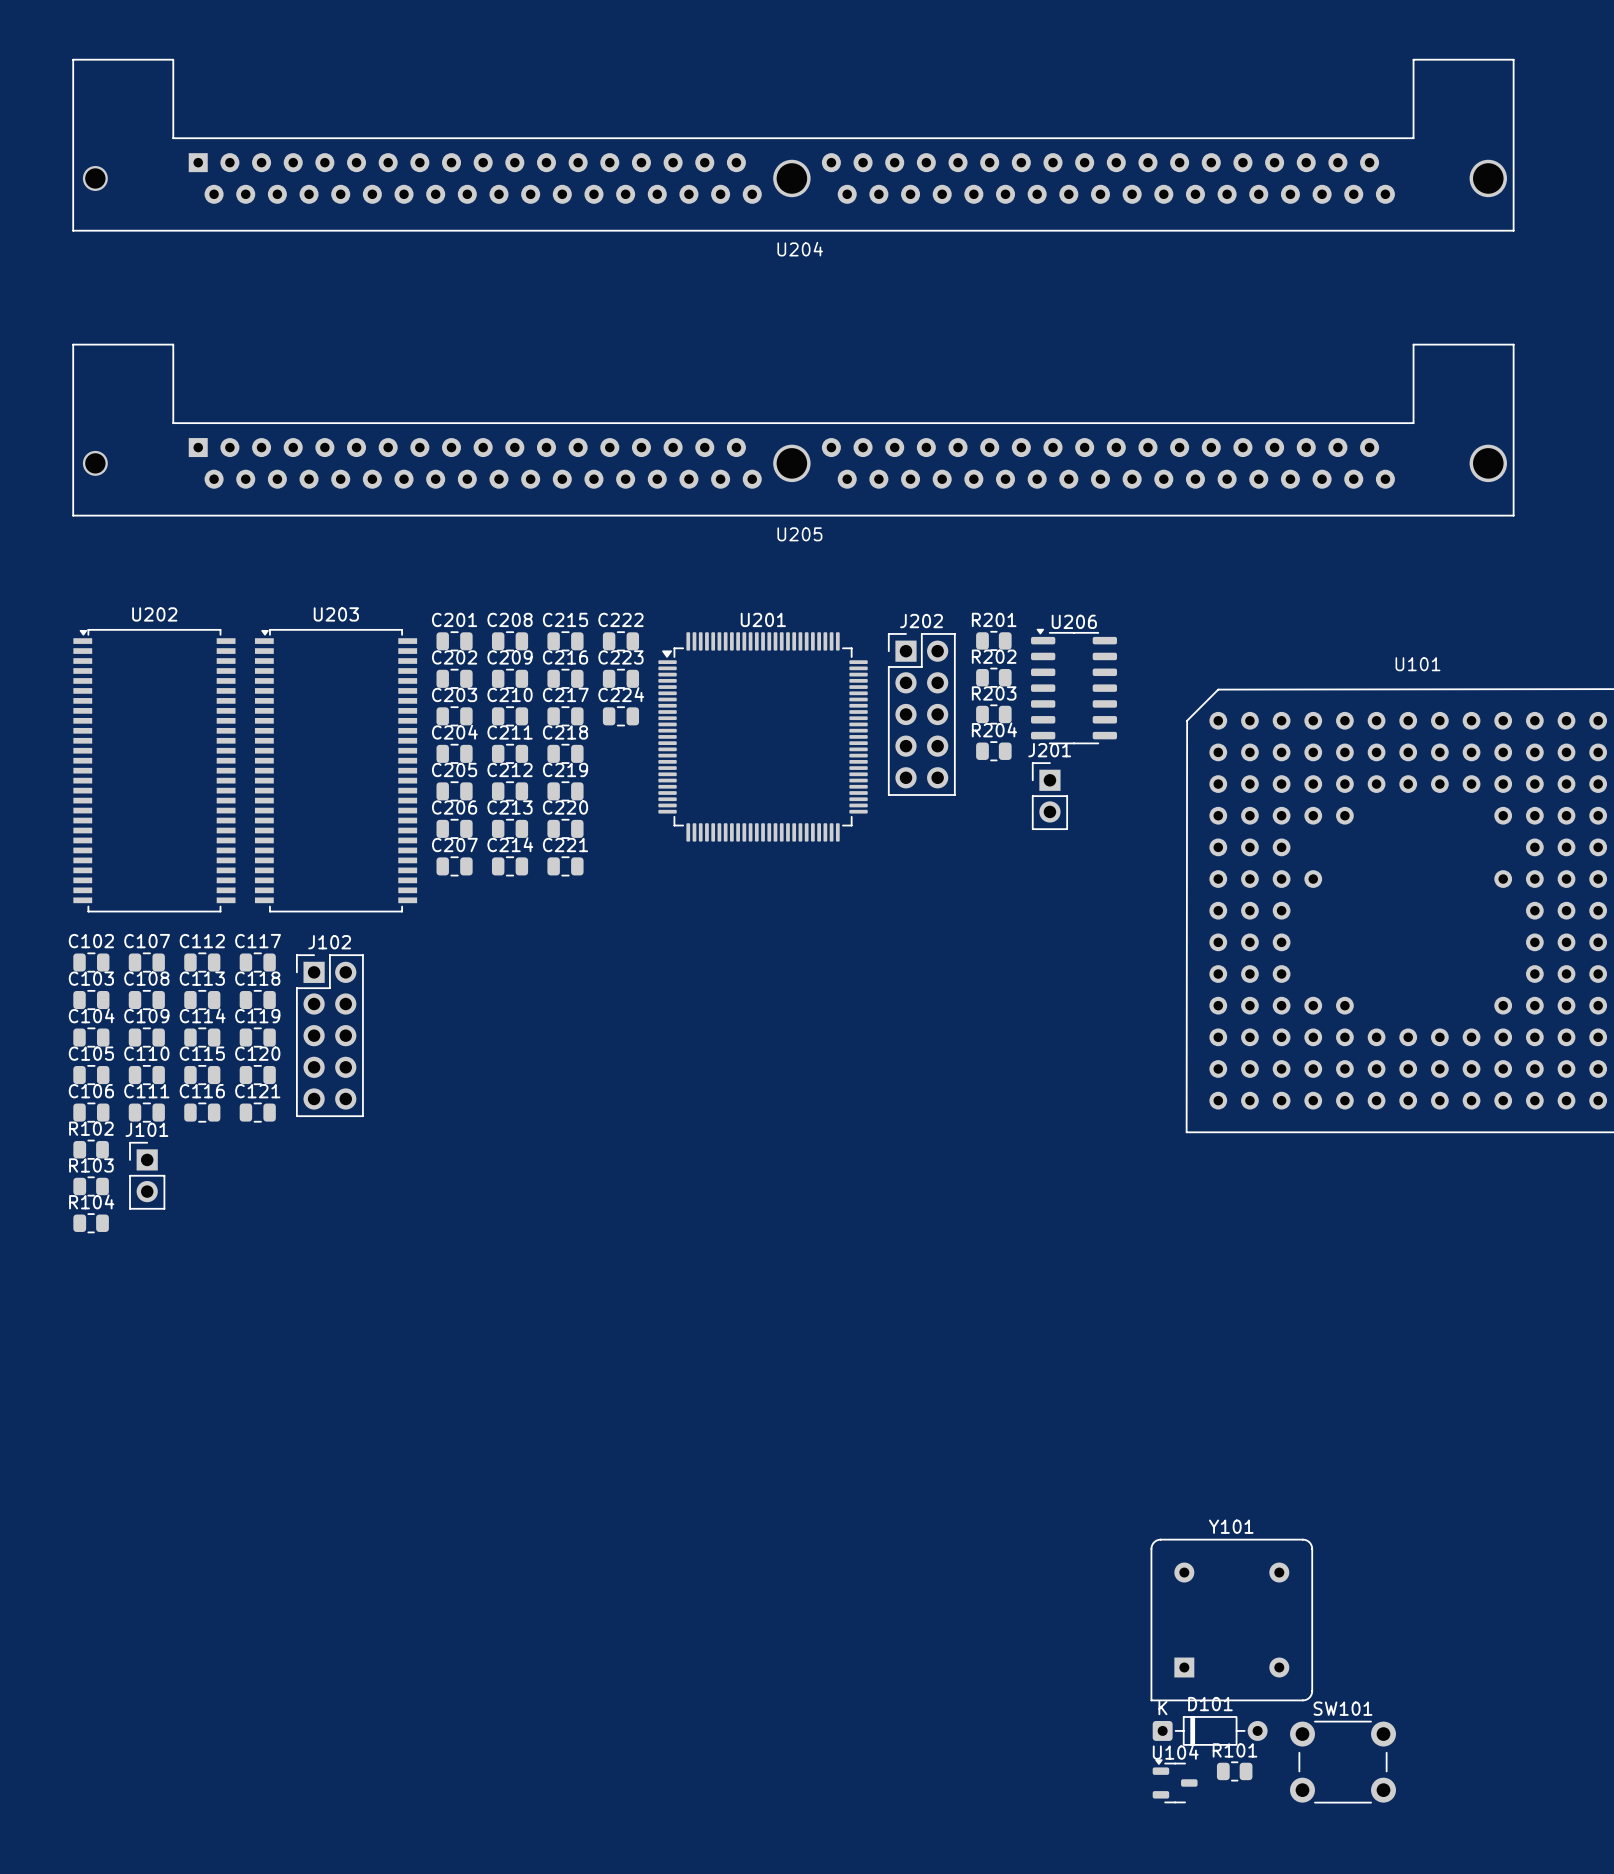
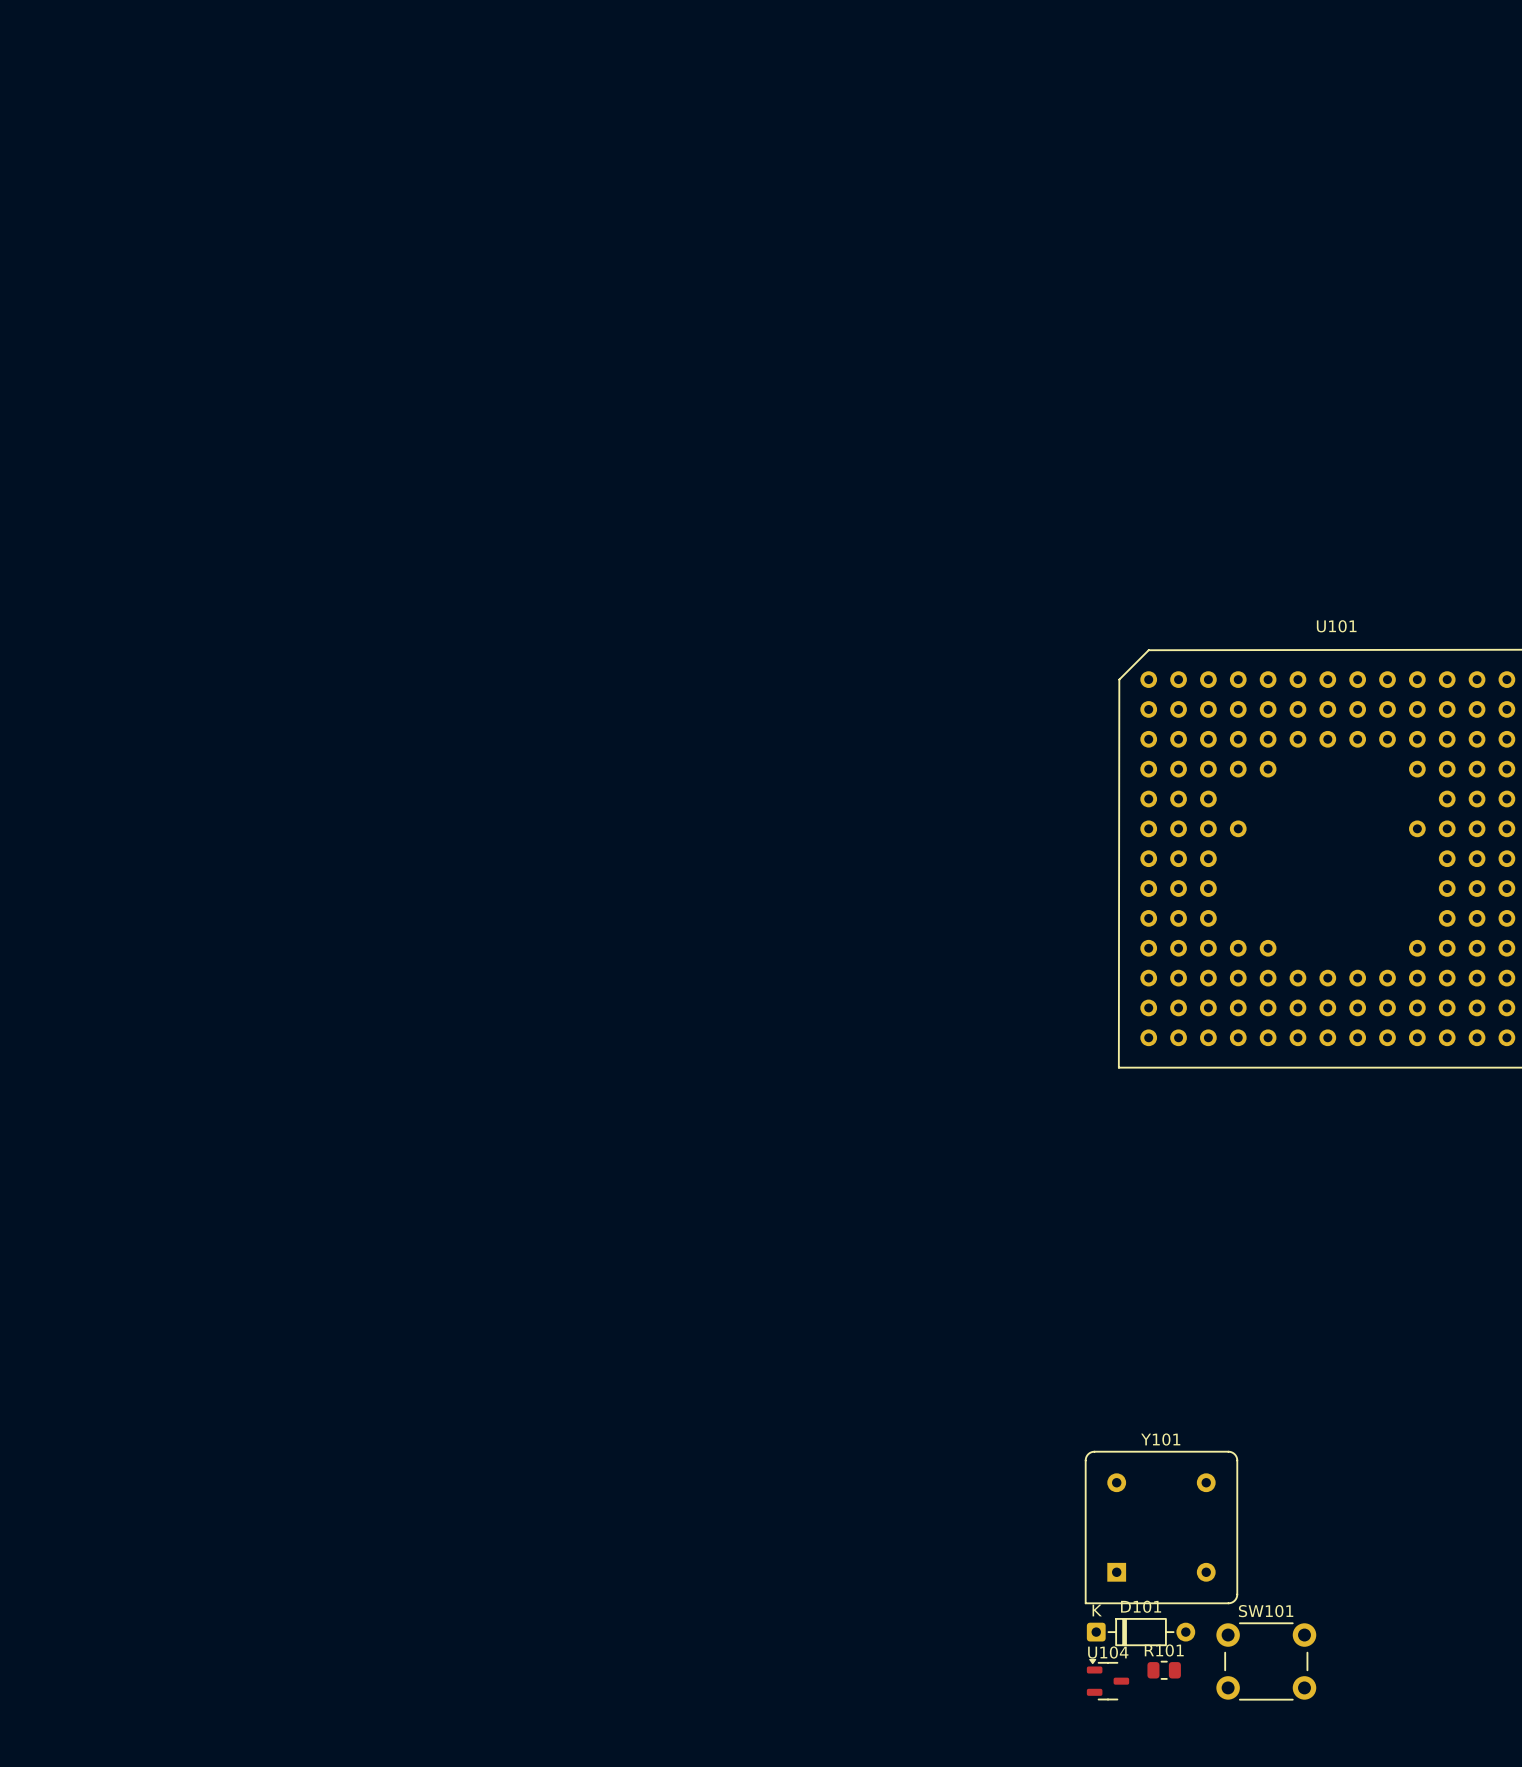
U204: (792, 195) -> none
U205: (792, 480) -> none
R201: (993, 640) -> none
C201: (454, 641) -> none
C208: (510, 641) -> none
C215: (565, 641) -> none
C222: (620, 641) -> none
R202: (993, 677) -> none
C202: (454, 678) -> none
C209: (510, 678) -> none
C216: (565, 678) -> none
C223: (620, 678) -> none
U206: (1074, 686) -> none
J202: (921, 714) -> none
R203: (993, 714) -> none
C203: (454, 716) -> none
C210: (510, 716) -> none
C217: (565, 716) -> none
C224: (620, 716) -> none
U201: (763, 736) -> none
R204: (993, 751) -> none
C204: (454, 753) -> none
C211: (510, 753) -> none
C218: (565, 753) -> none
U202: (154, 770) -> none
U203: (336, 770) -> none
C205: (454, 791) -> none
C212: (510, 791) -> none
C219: (565, 791) -> none
J201: (1049, 796) -> none
C206: (454, 828) -> none
C213: (510, 828) -> none
C220: (565, 828) -> none
C207: (454, 866) -> none
C214: (510, 866) -> none
C221: (565, 866) -> none
C102: (91, 962) -> none
C107: (146, 962) -> none
C112: (202, 962) -> none
C117: (257, 962) -> none
C103: (91, 1000) -> none
C108: (146, 1000) -> none
C113: (202, 1000) -> none
C118: (257, 1000) -> none
J102: (329, 1035) -> none
C104: (91, 1037) -> none
C109: (146, 1037) -> none
C114: (202, 1037) -> none
C119: (257, 1037) -> none
C105: (91, 1075) -> none
C110: (146, 1075) -> none
C115: (202, 1075) -> none
C120: (257, 1075) -> none
C106: (91, 1112) -> none
C111: (146, 1112) -> none
C116: (202, 1112) -> none
C121: (257, 1112) -> none
R102: (91, 1149) -> none
J101: (147, 1175) -> none
R103: (91, 1186) -> none
R104: (91, 1223) -> none

